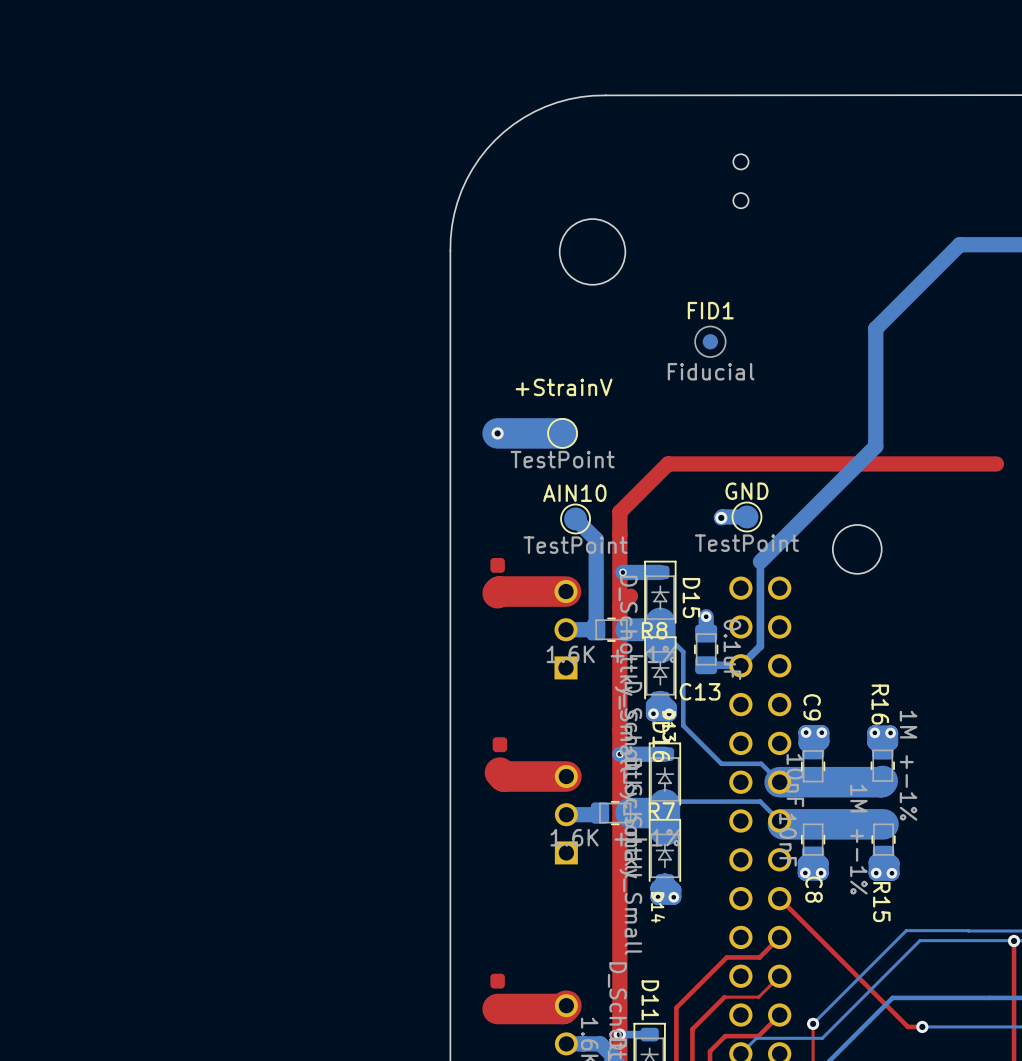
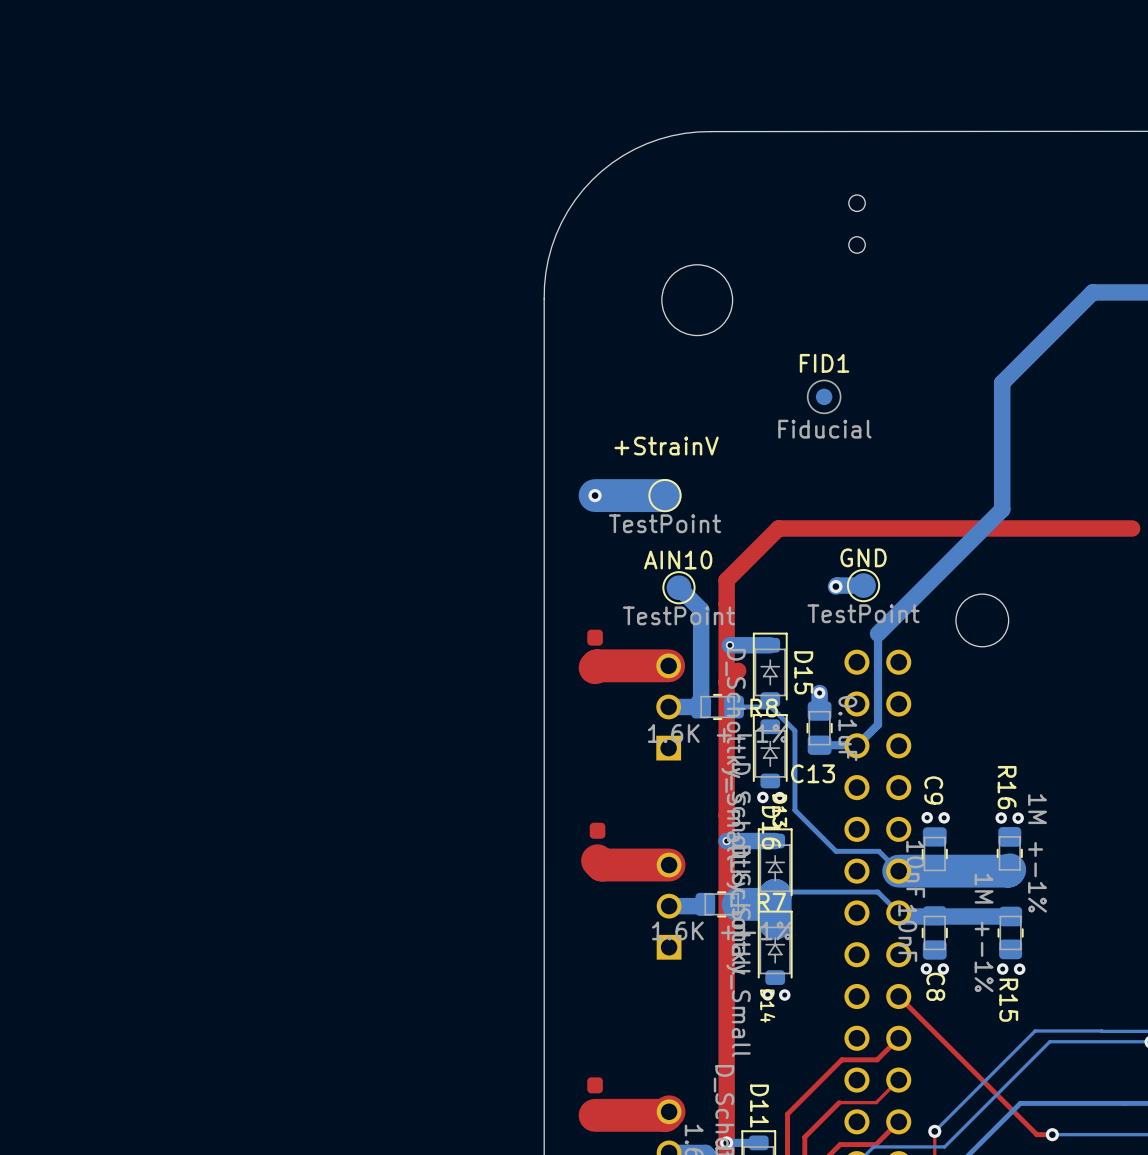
bottom track: (626, 629) (653, 629) (660, 622) (660, 648) -> none
bottom track: (653, 713) (653, 705) (660, 698) (669, 707) (669, 713) (653, 713) -> none
bottom track: (806, 732) (806, 743) (813, 750) (821, 741) (821, 732) (806, 732) -> none
bottom track: (874, 732) (874, 742) (882, 750) (890, 742) (890, 733) (874, 733) -> none
bottom track width: thick (883, 824) (782, 824) -> thin (1010, 916) (902, 916)
bottom track: (805, 872) (805, 863) (813, 855) (821, 863) (821, 873) (805, 873) -> none
bottom track: (876, 873) (876, 862) (883, 854) (891, 863) (891, 873) (876, 873) -> none
bottom track: (658, 897) (658, 887) (664, 881) (673, 889) (673, 897) (658, 897) -> none

